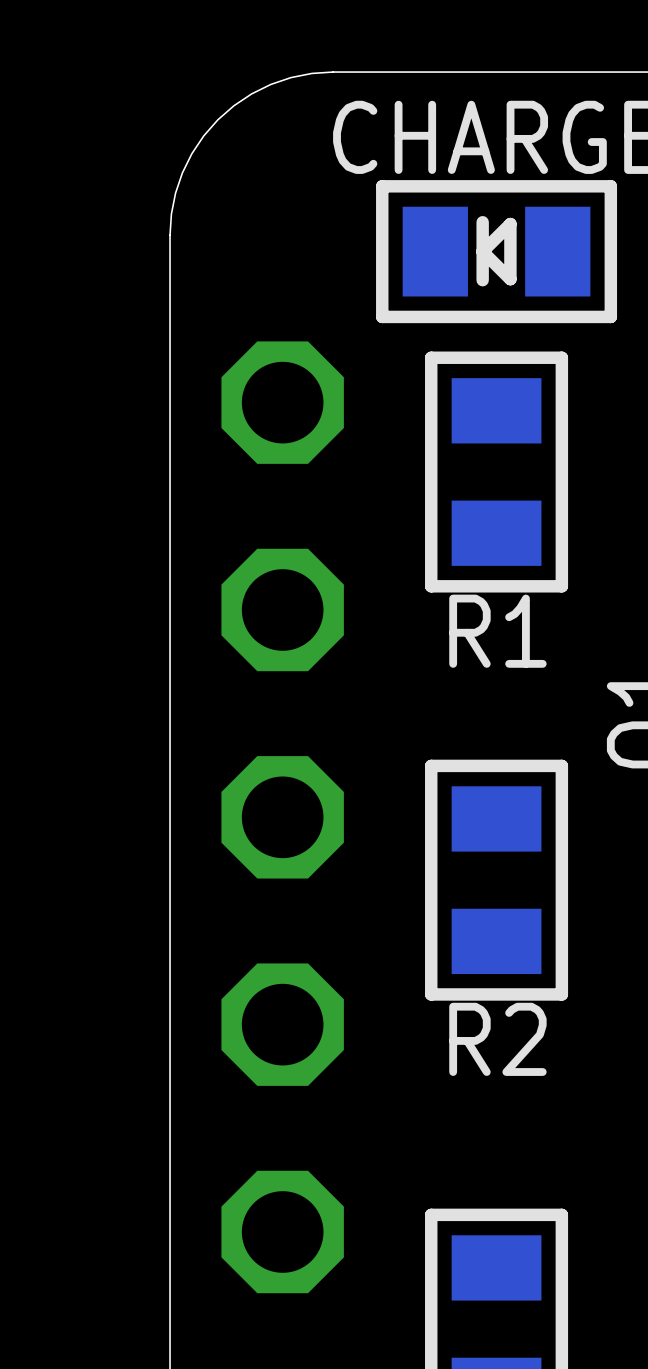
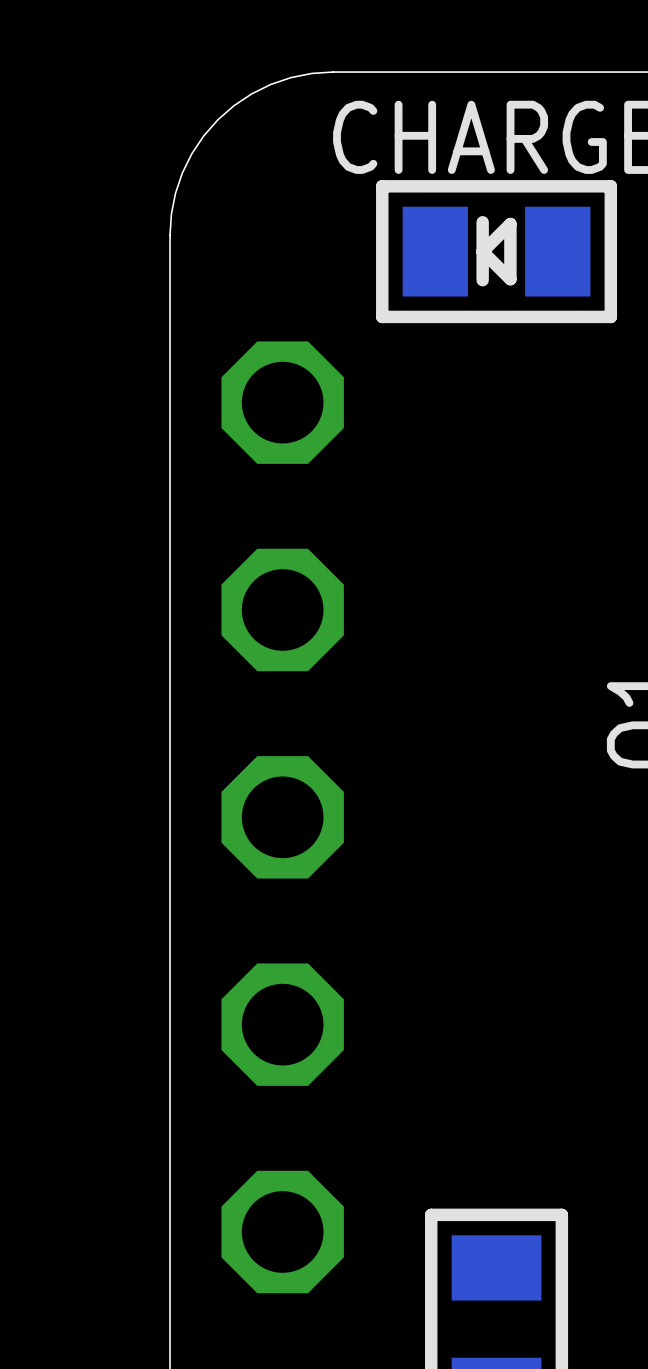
R1: (496, 472) -> none
R2: (496, 880) -> none

